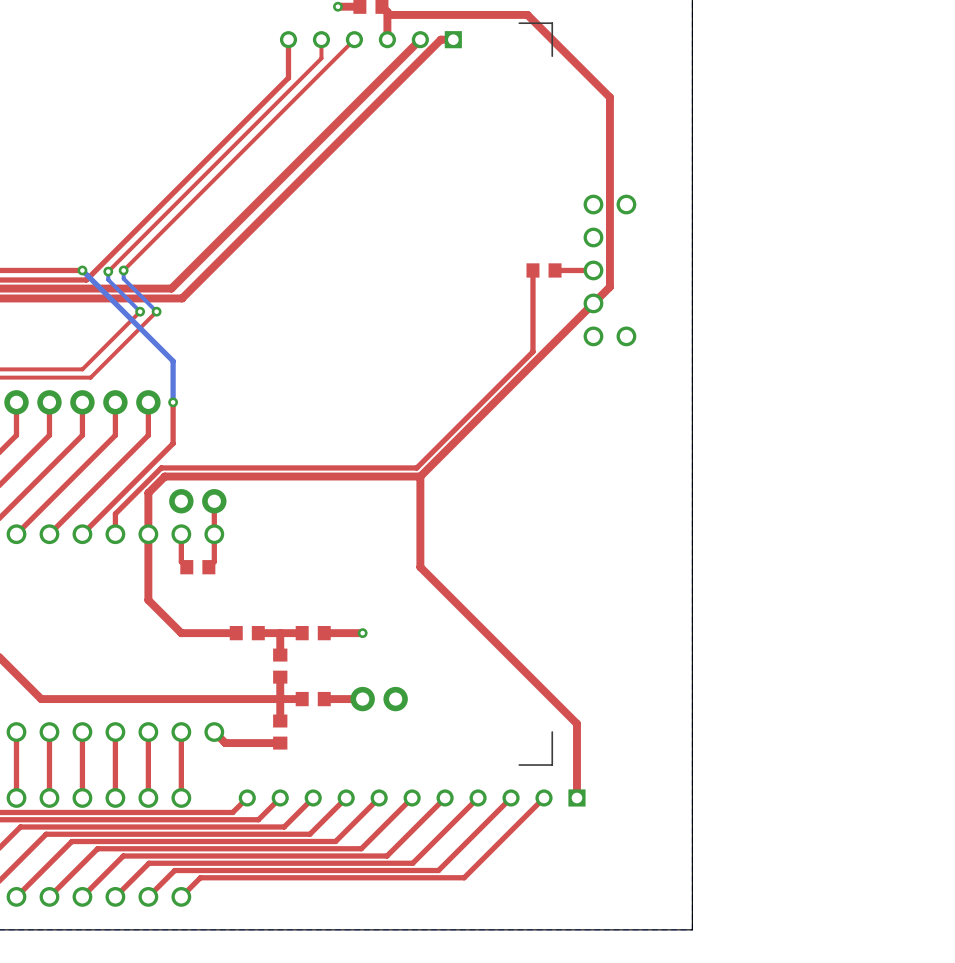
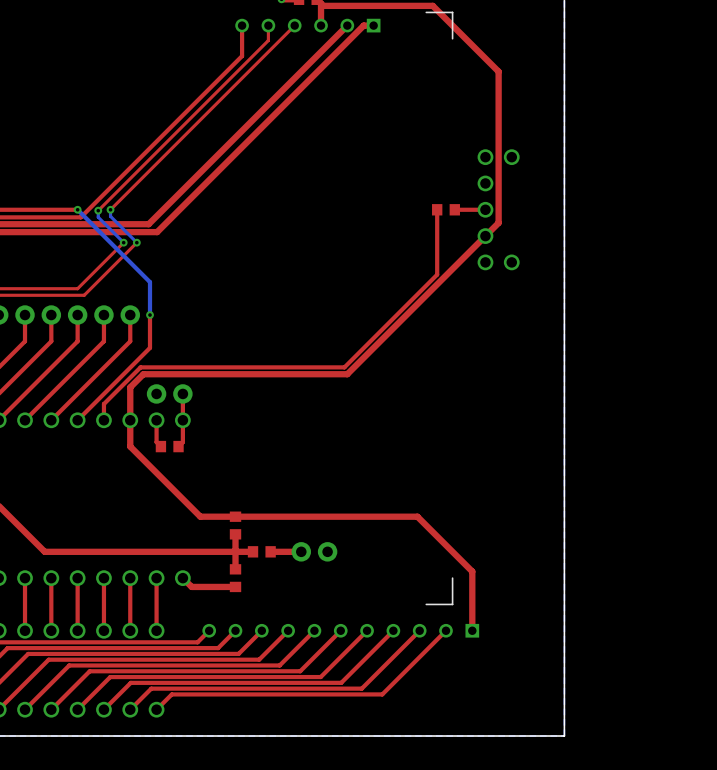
top track: (420, 476) (420, 567) (508, 655) -> none
top track: (148, 567) (148, 600) (181, 633) (236, 633) -> (130, 446) (200, 516) (417, 516)
part: (247, 633) -> none
top track: (280, 633) (280, 655) -> none
top track: (302, 633) (258, 633) -> none
part: (313, 633) -> none
top track: (362, 633) (324, 633) -> none
via: (362, 633) -> none

